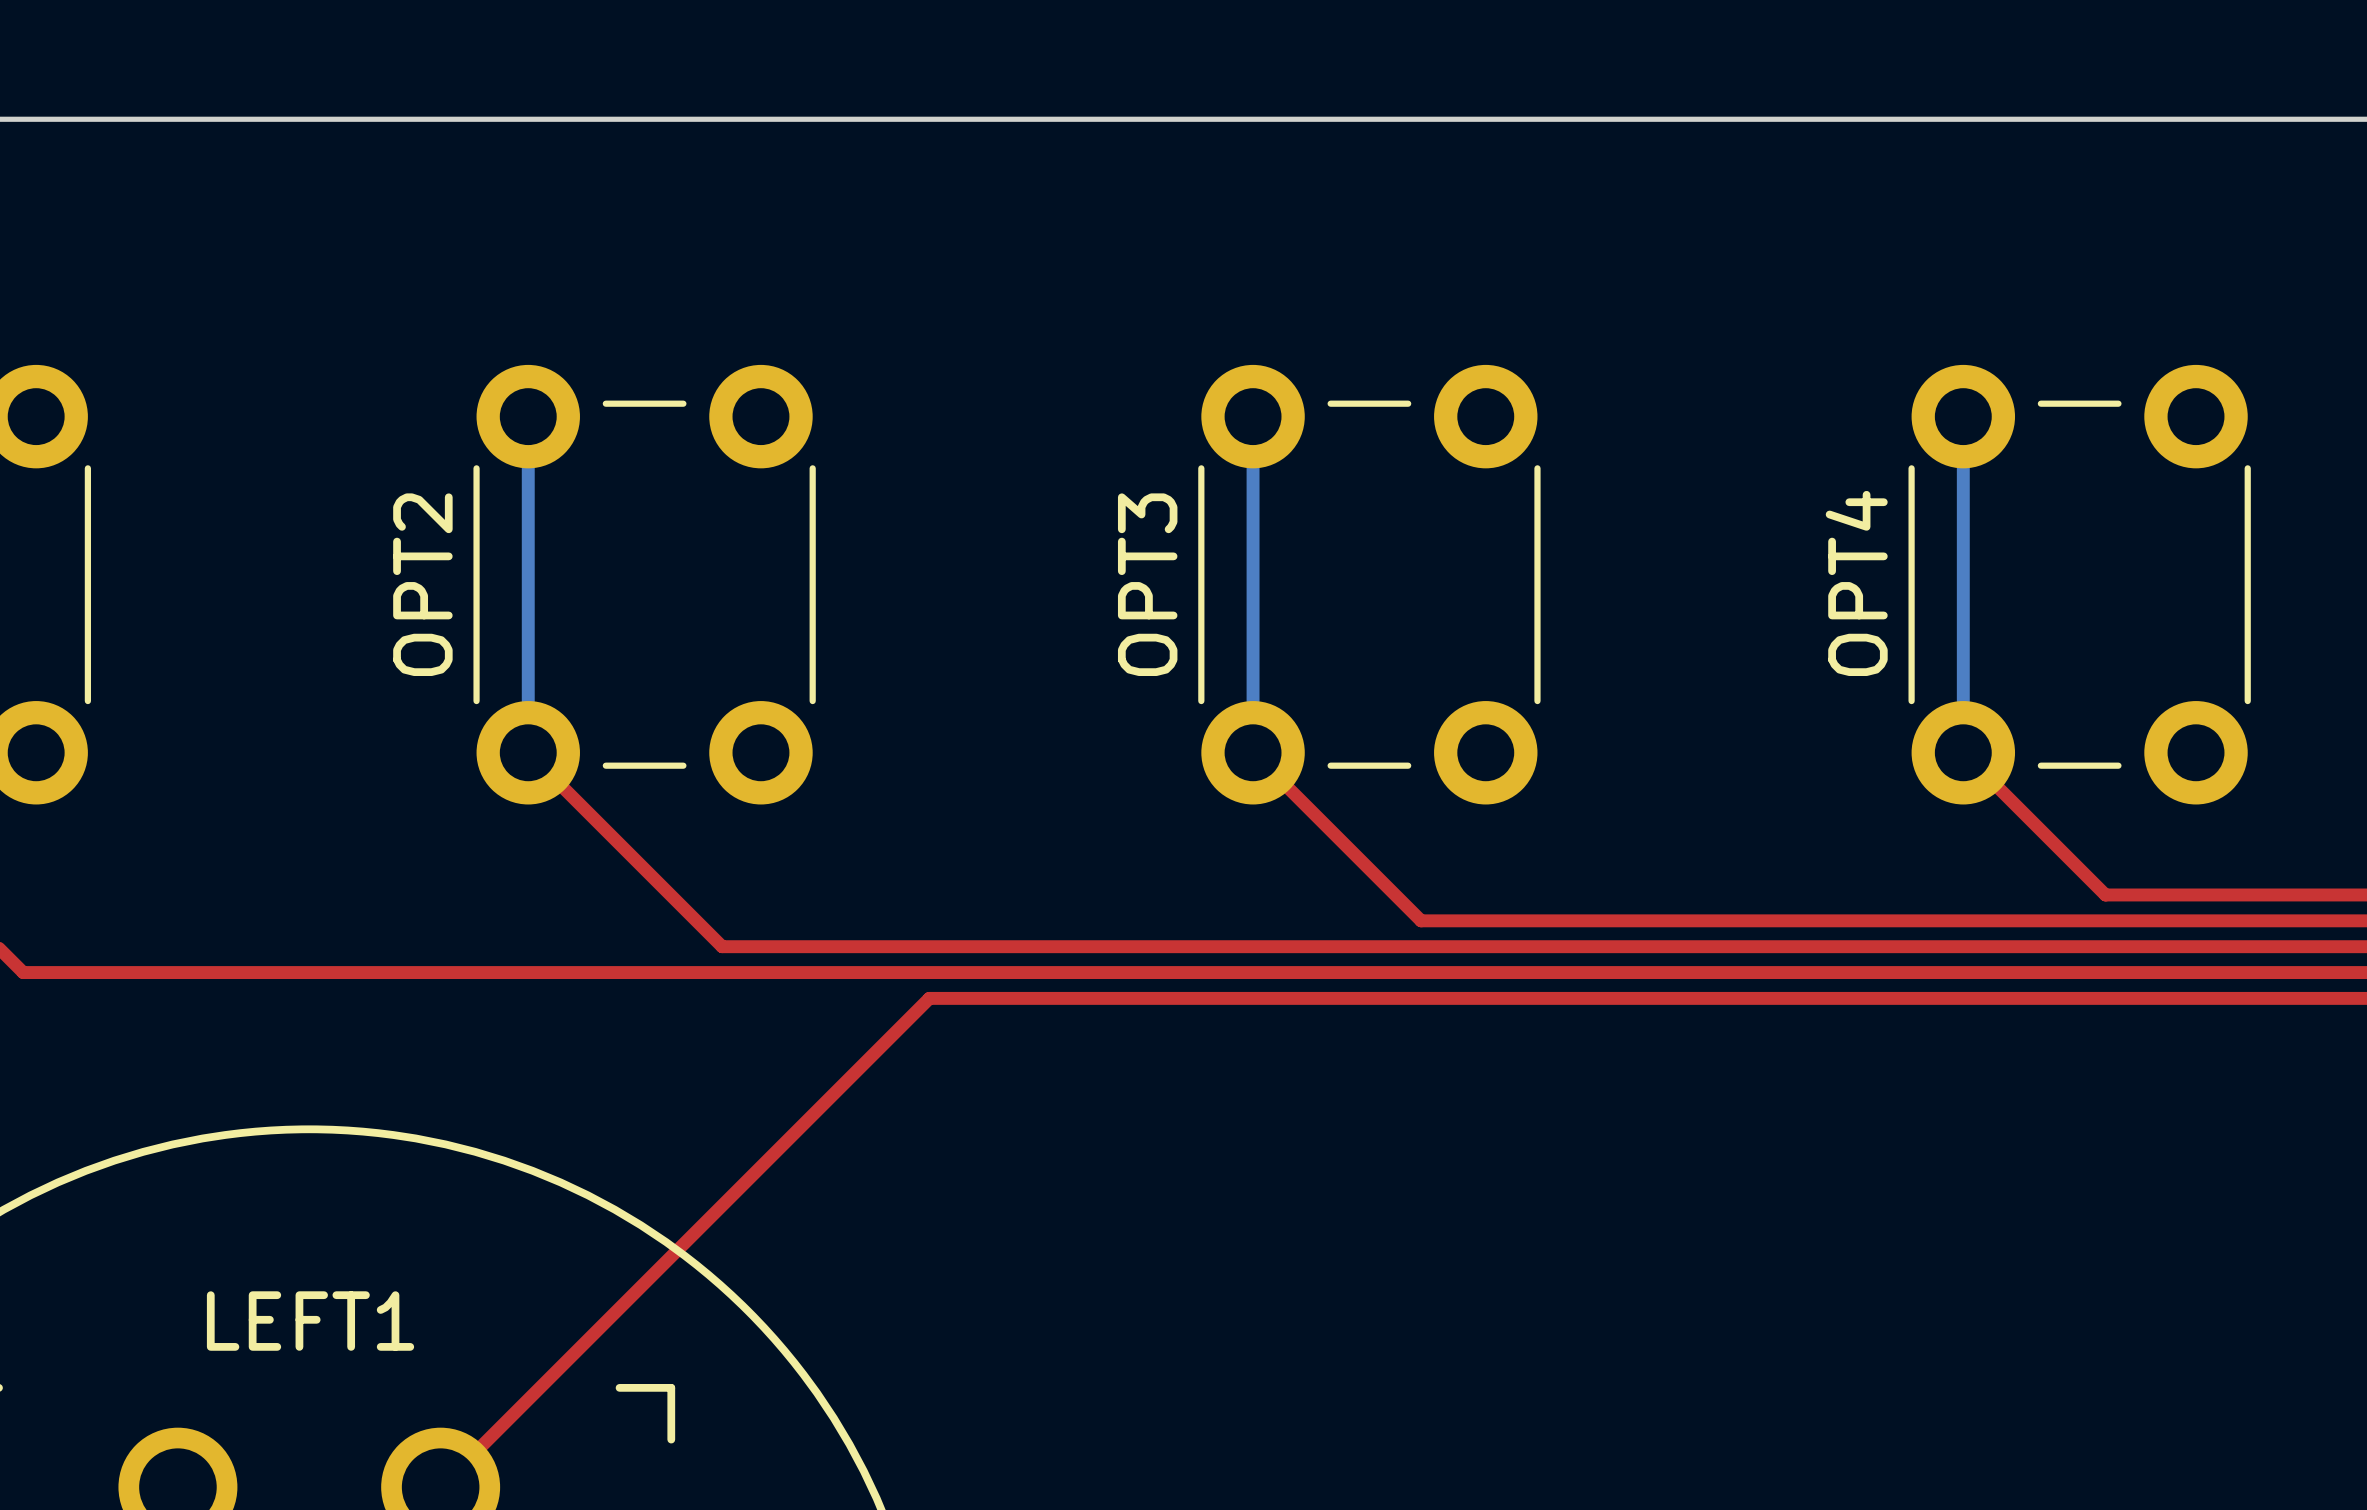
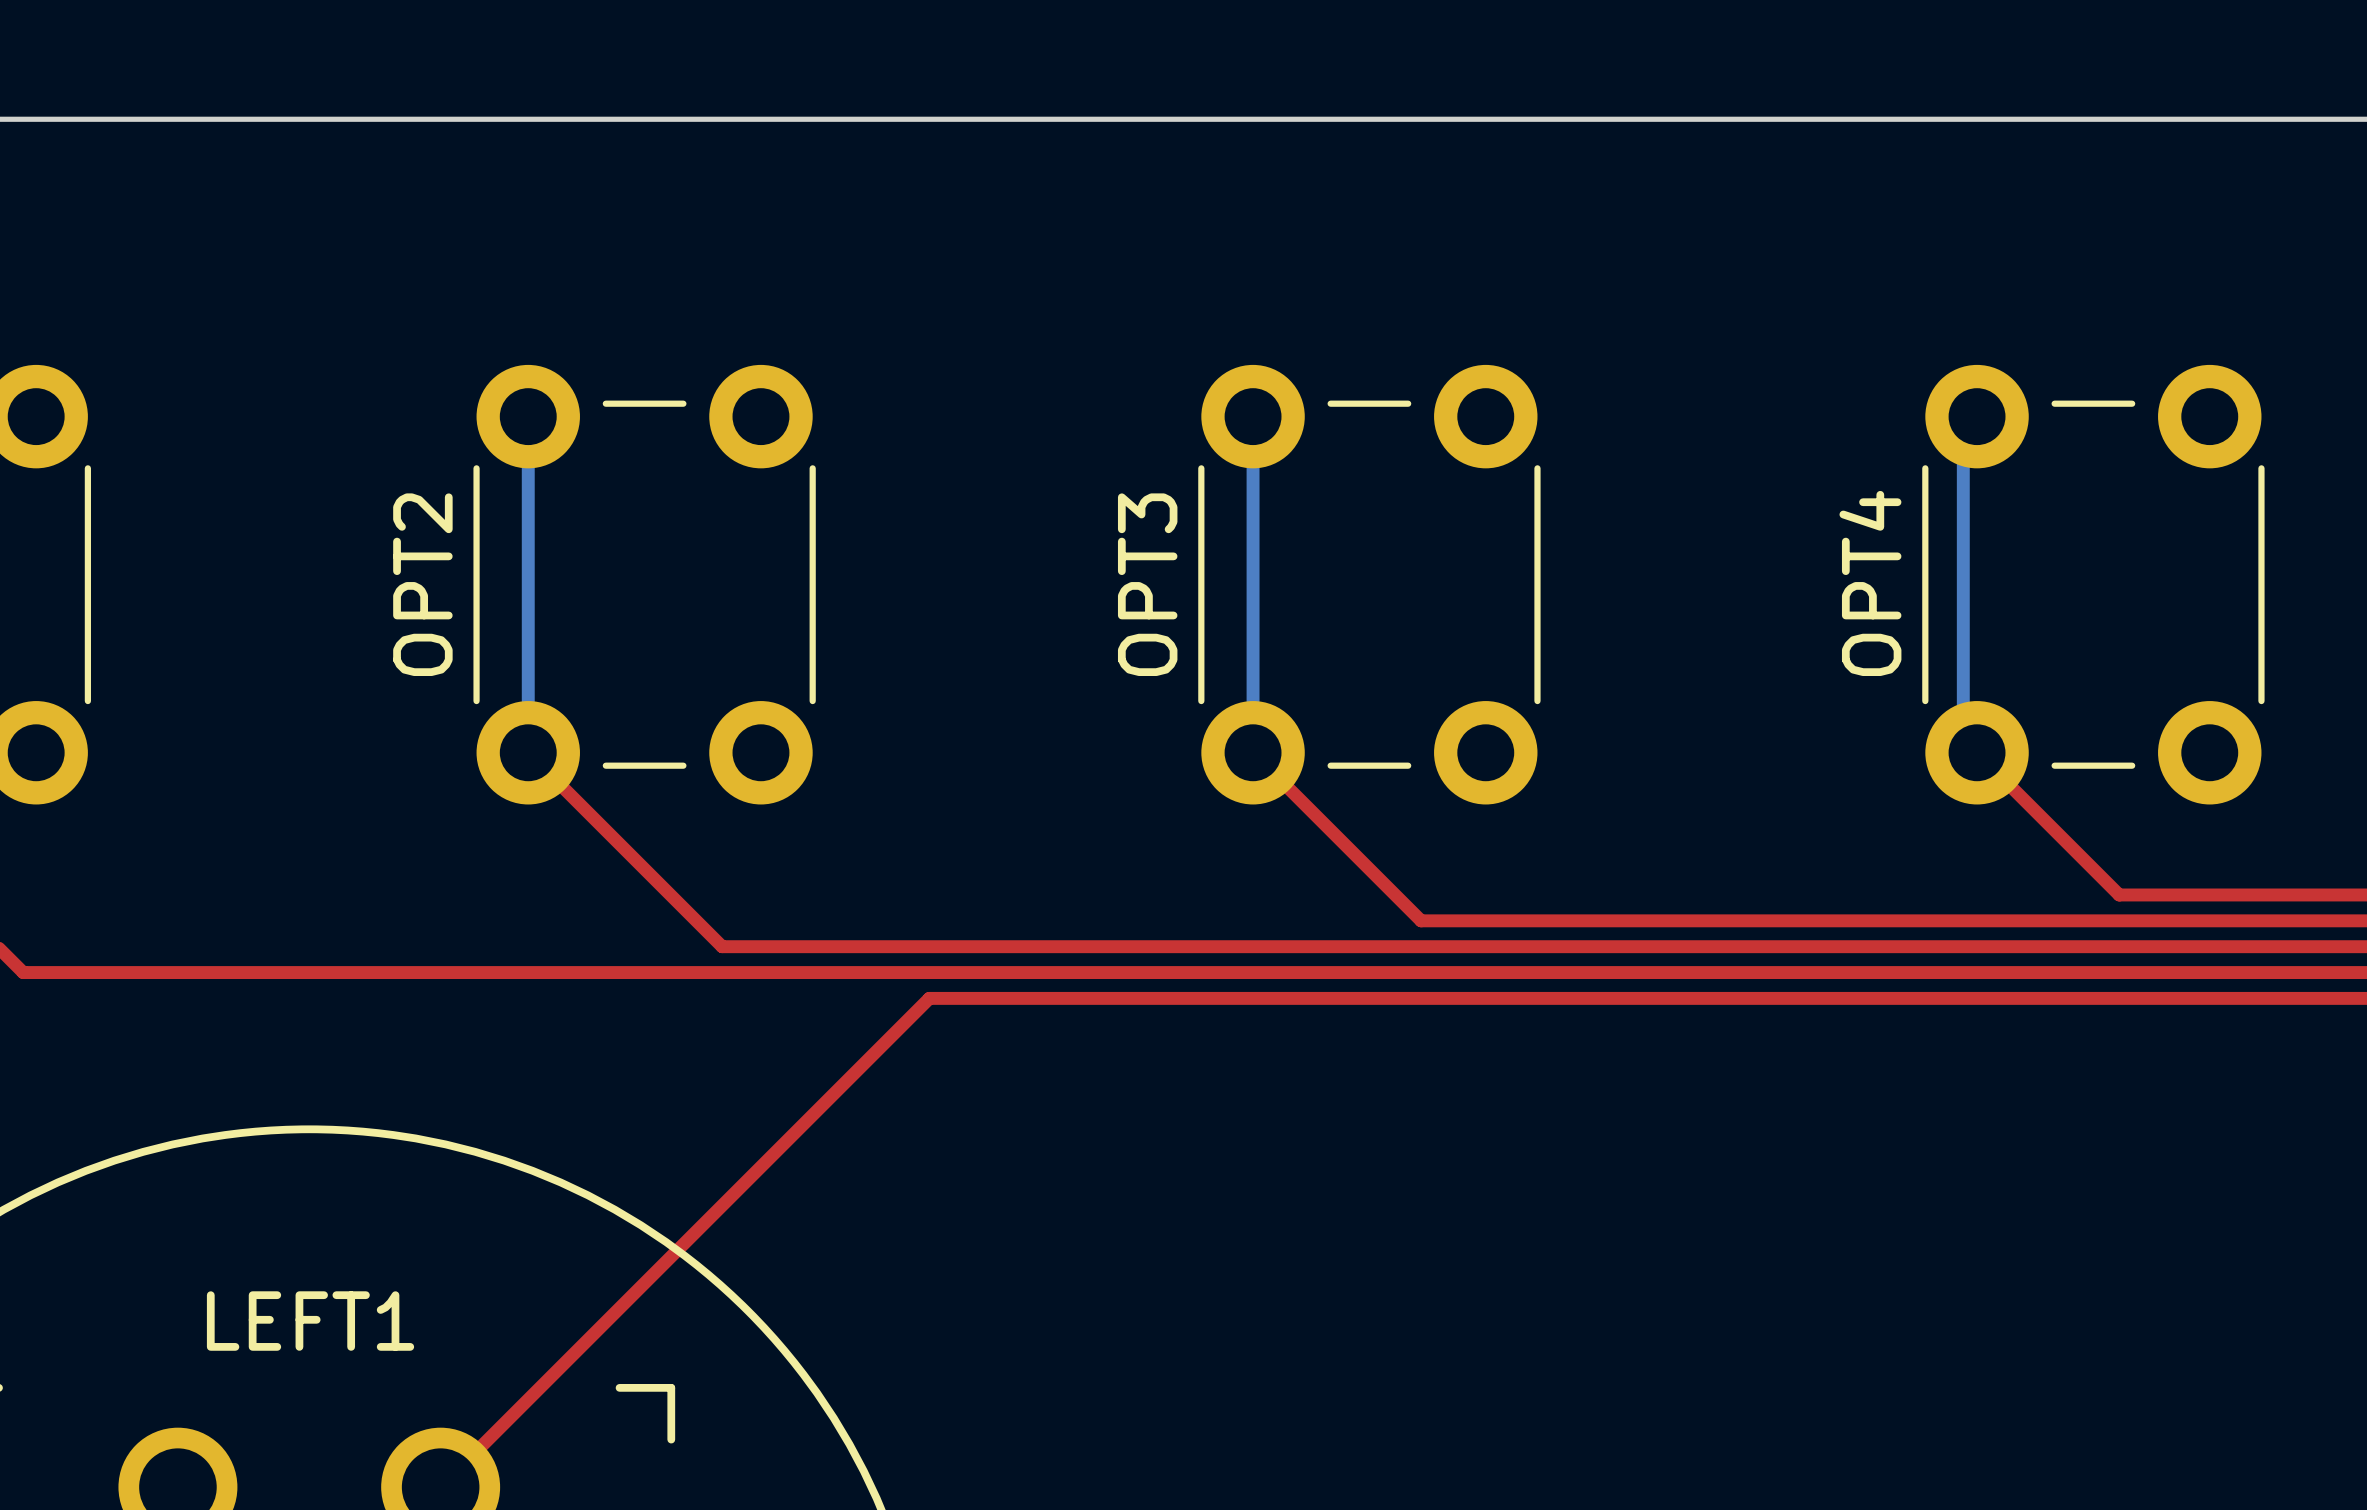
OPT4 position: (2079, 584) -> (2093, 584)
top track: (1963, 752) (2105, 894) (2119, 894) -> (1977, 752) (2119, 894)

